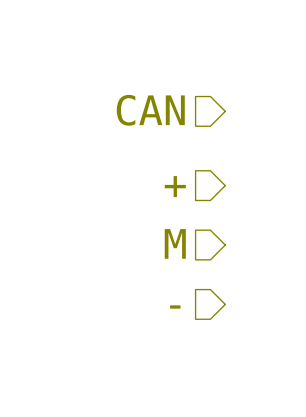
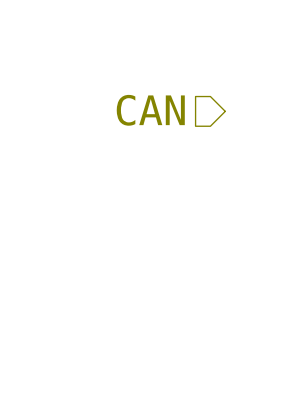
hierarchical label: + (175, 186) -> none
hierarchical label: M (175, 243) -> none
hierarchical label: - (175, 307) -> none

